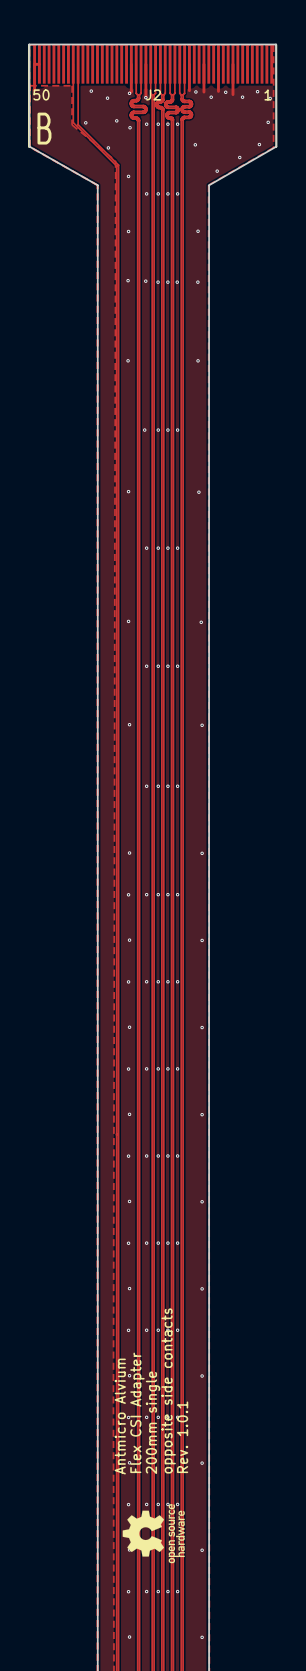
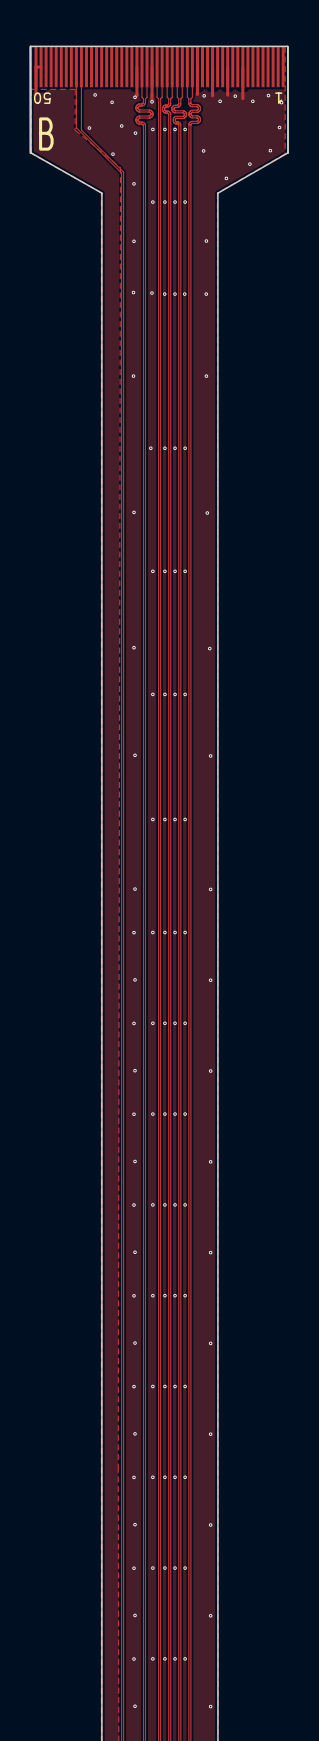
text rotation: 0° (41, 94) -> 180° (42, 98)
J2 name: J2 (153, 94) -> none
text rotation: 0° (267, 94) -> 180° (278, 98)
text: opposite side contacts (168, 1390) -> none
text: Flex CSI Adapter (137, 1412) -> none
text: Antmicro Alvium (120, 1416) -> none
text: 200mm single (153, 1422) -> none
text: Rev. 1.0.1 (182, 1437) -> none
drawing: [122, 1504, 185, 1564] -> none

